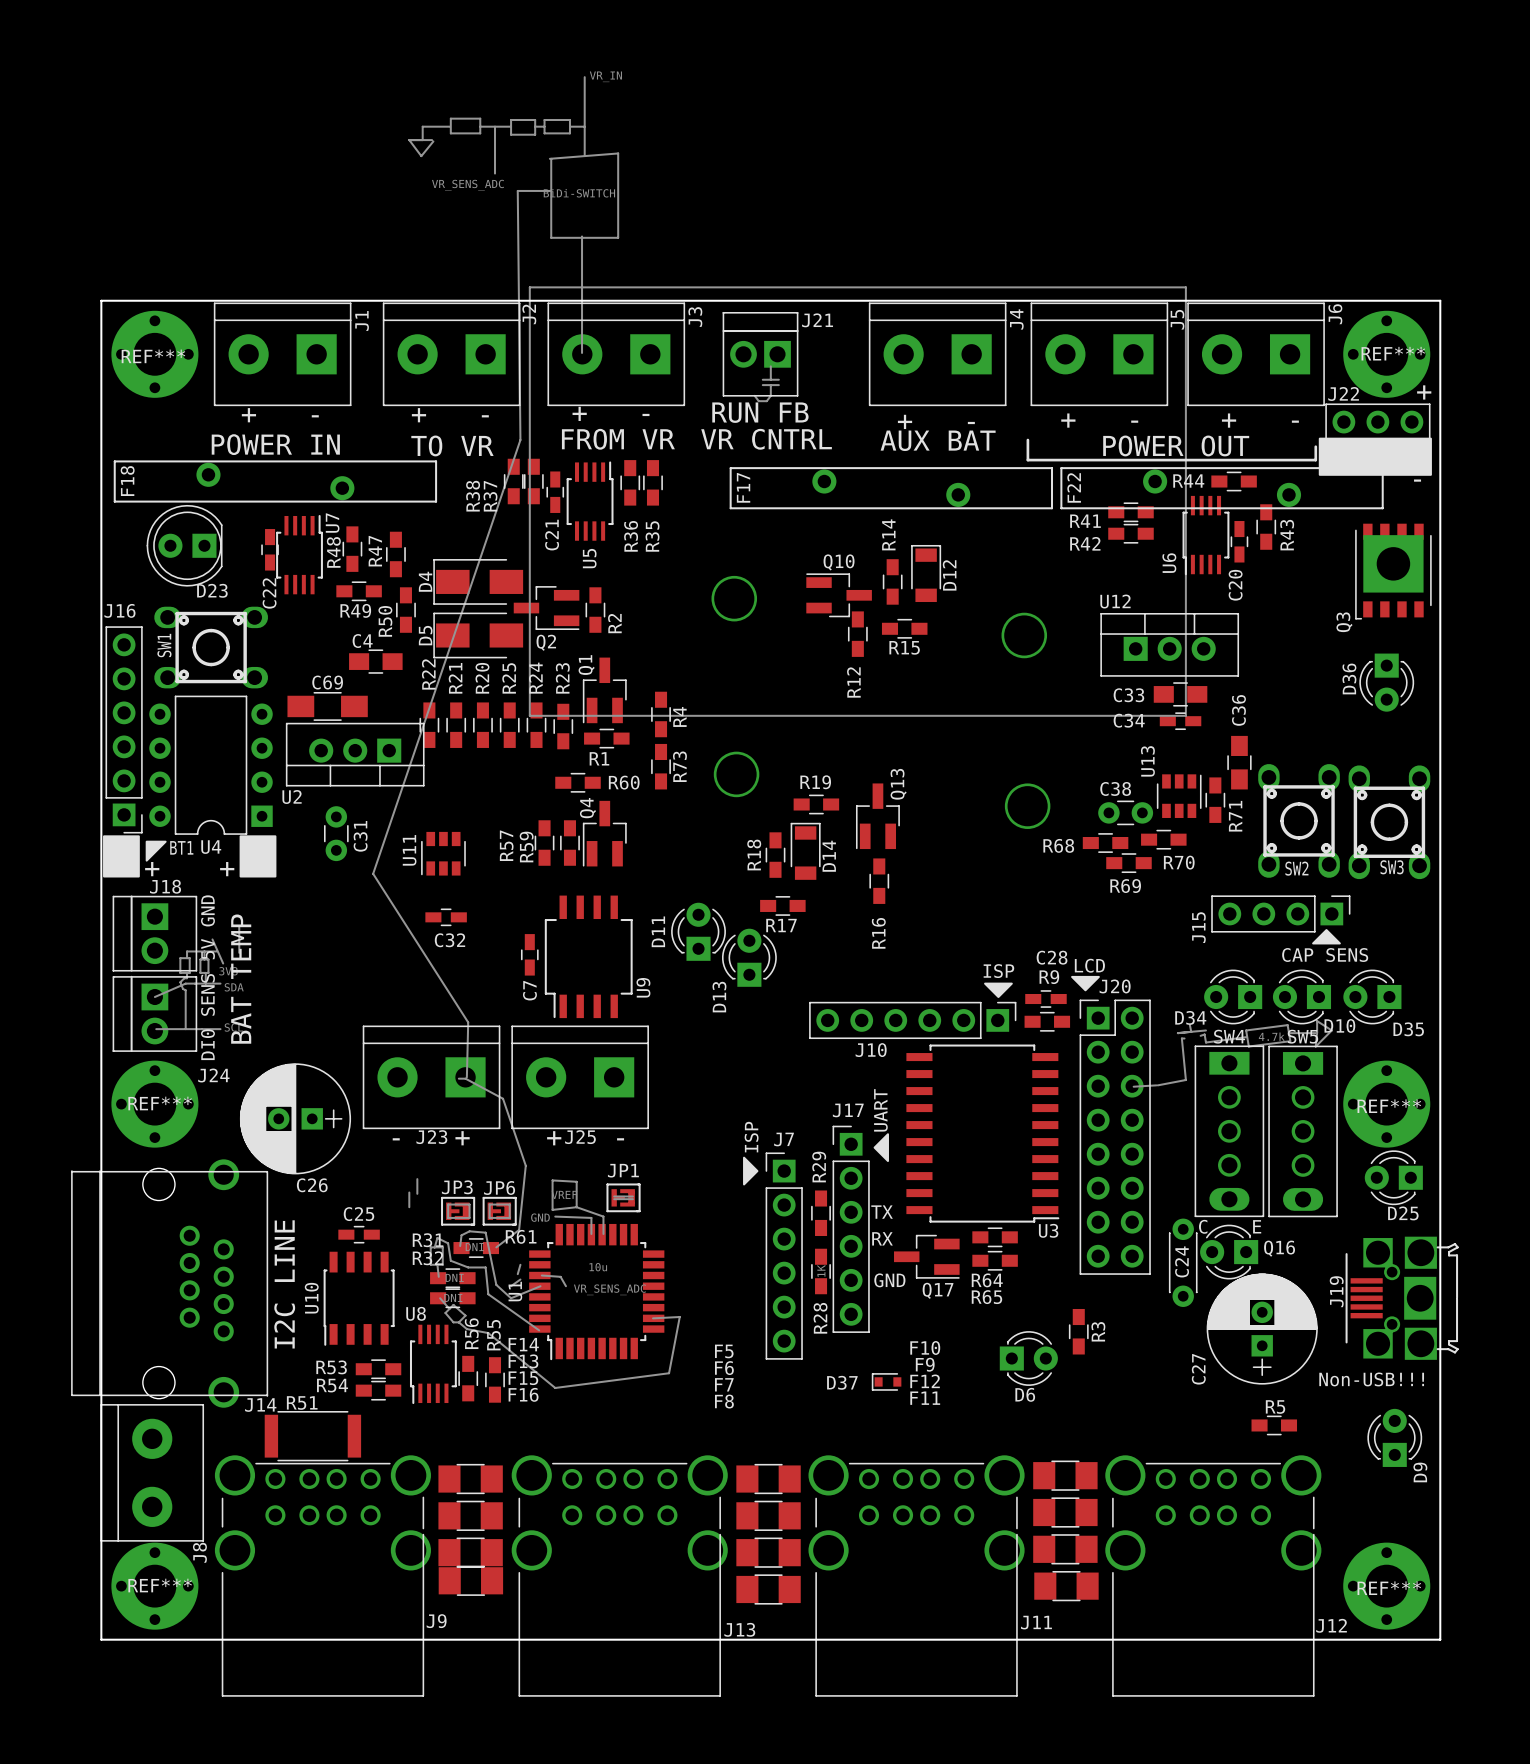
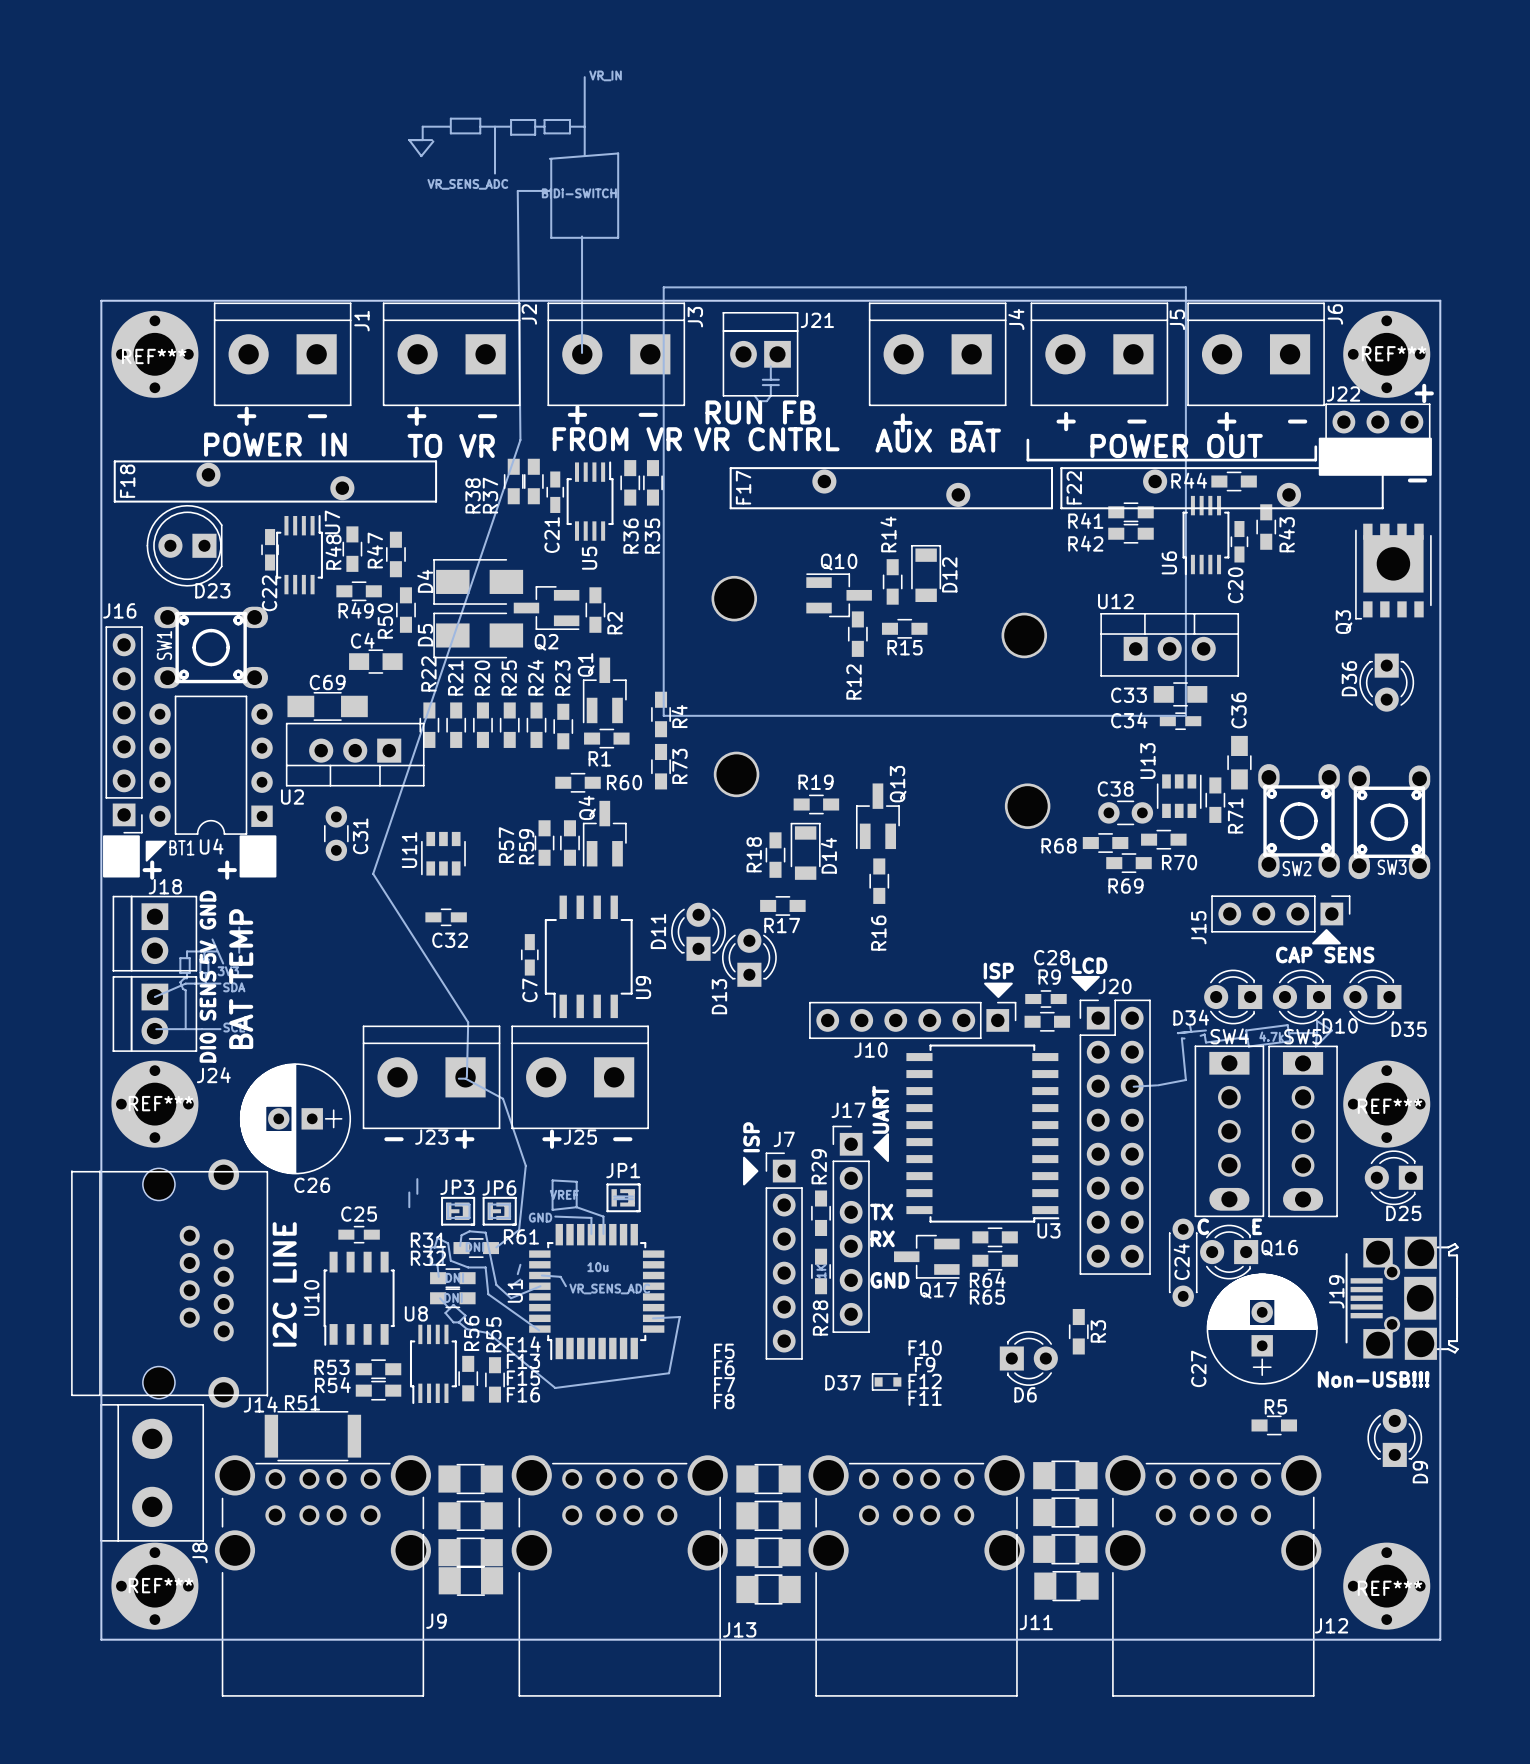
line: (663, 287) (529, 287) (529, 715) (663, 715) -> (663, 287) (663, 715)

